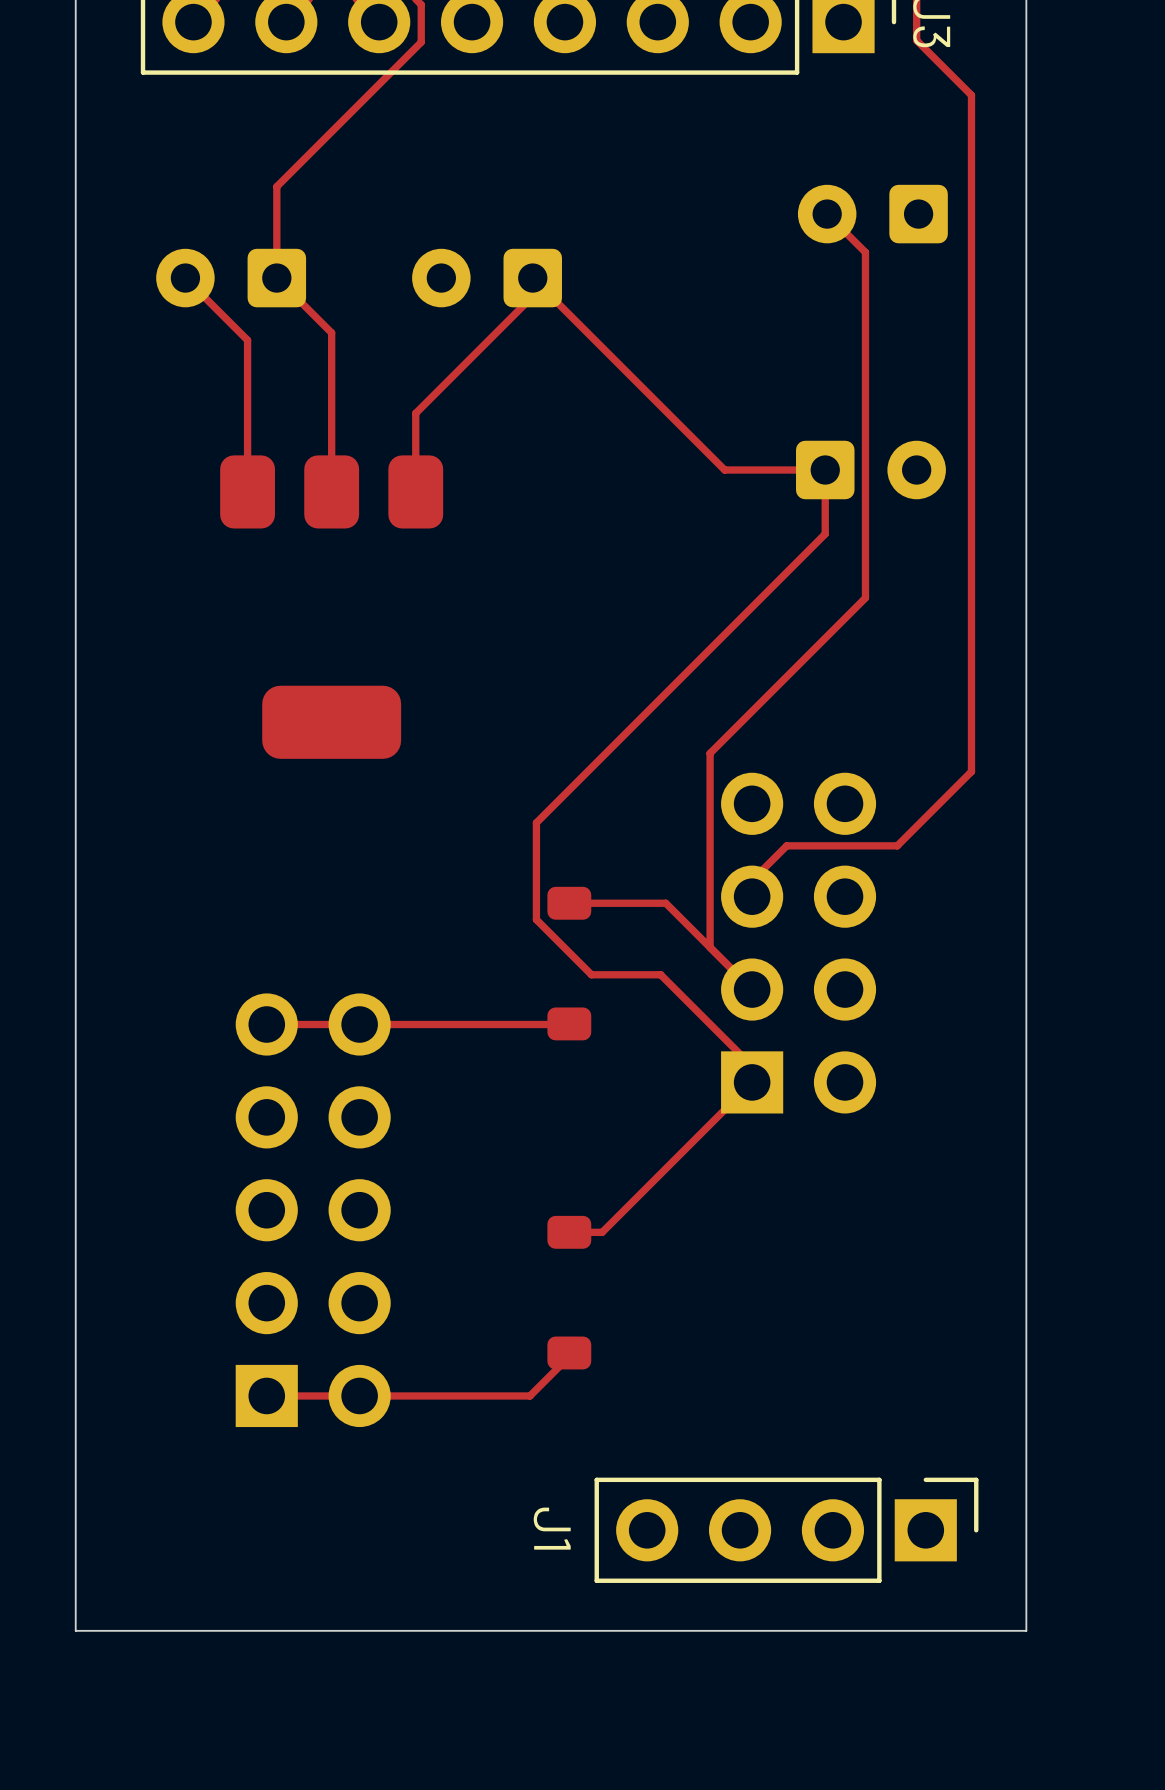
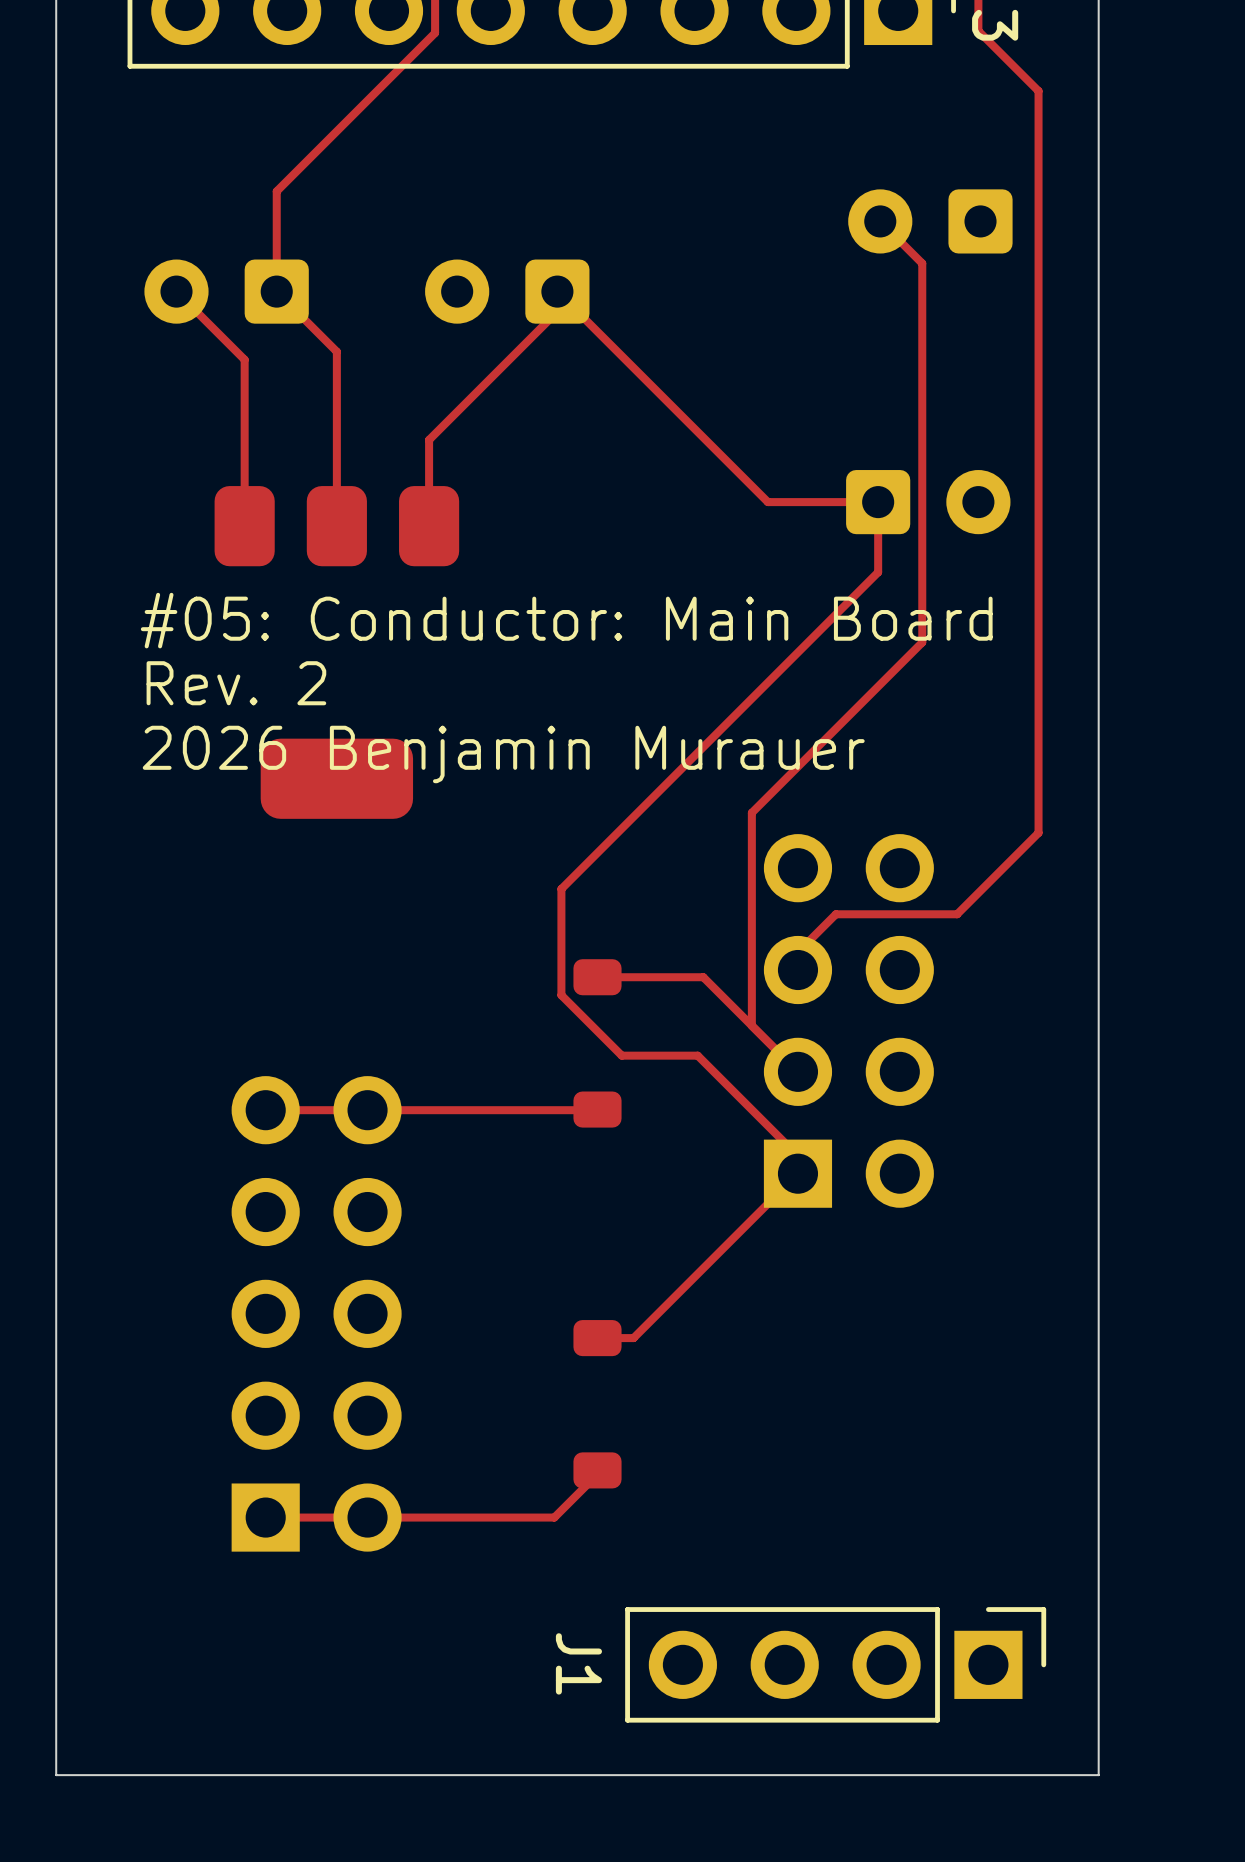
text: none -> #05: Conductor: Main Board (566, 620)
text: none -> Rev. 2 (236, 683)
text: none -> 2026 Benjamin Murauer (503, 754)

